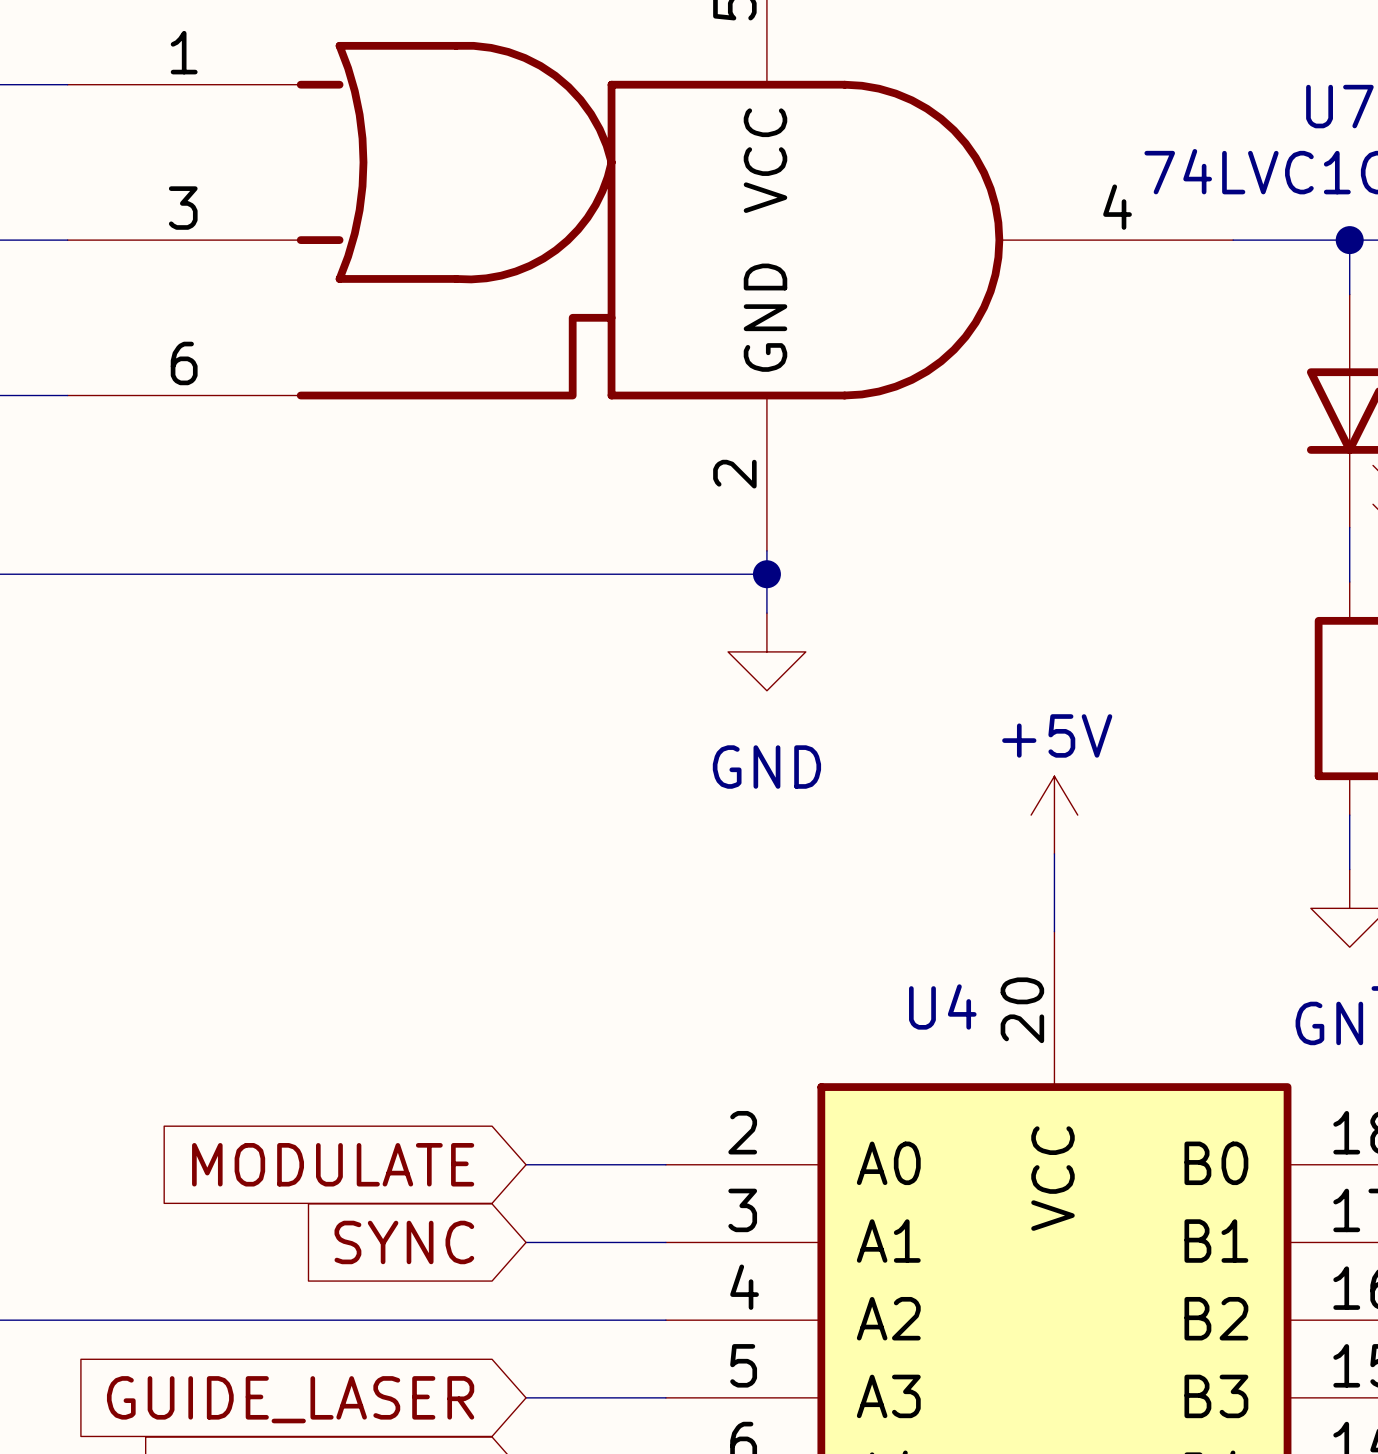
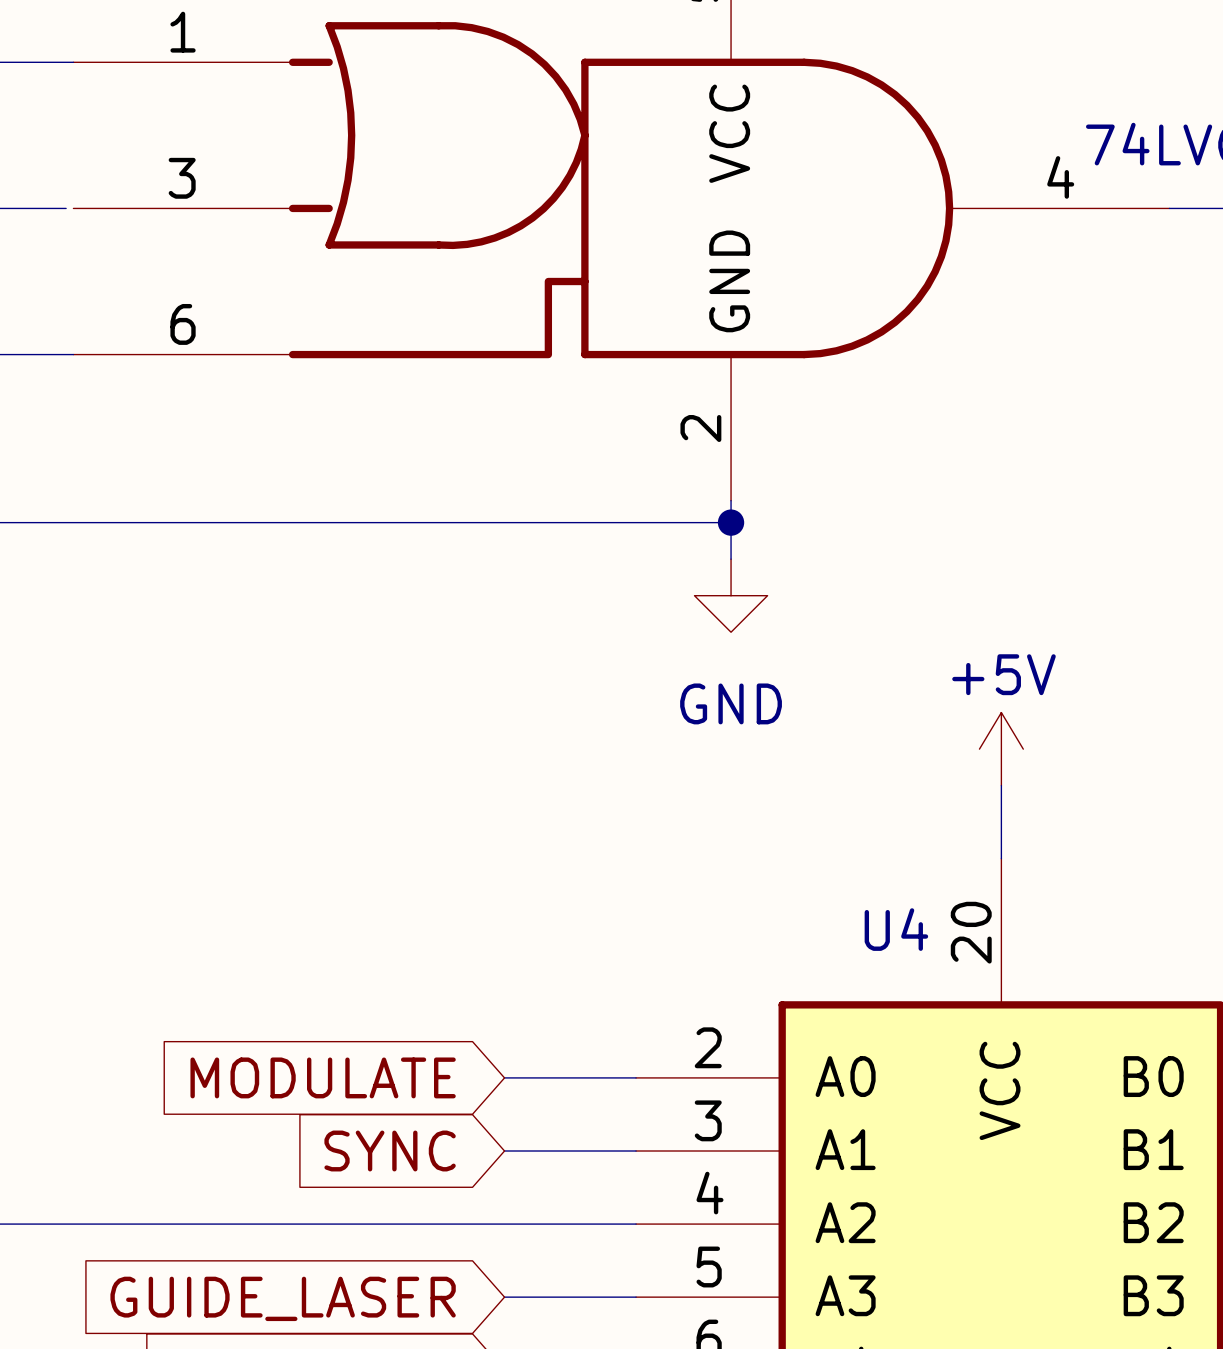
wire: (59, 240) (67, 240) -> none

